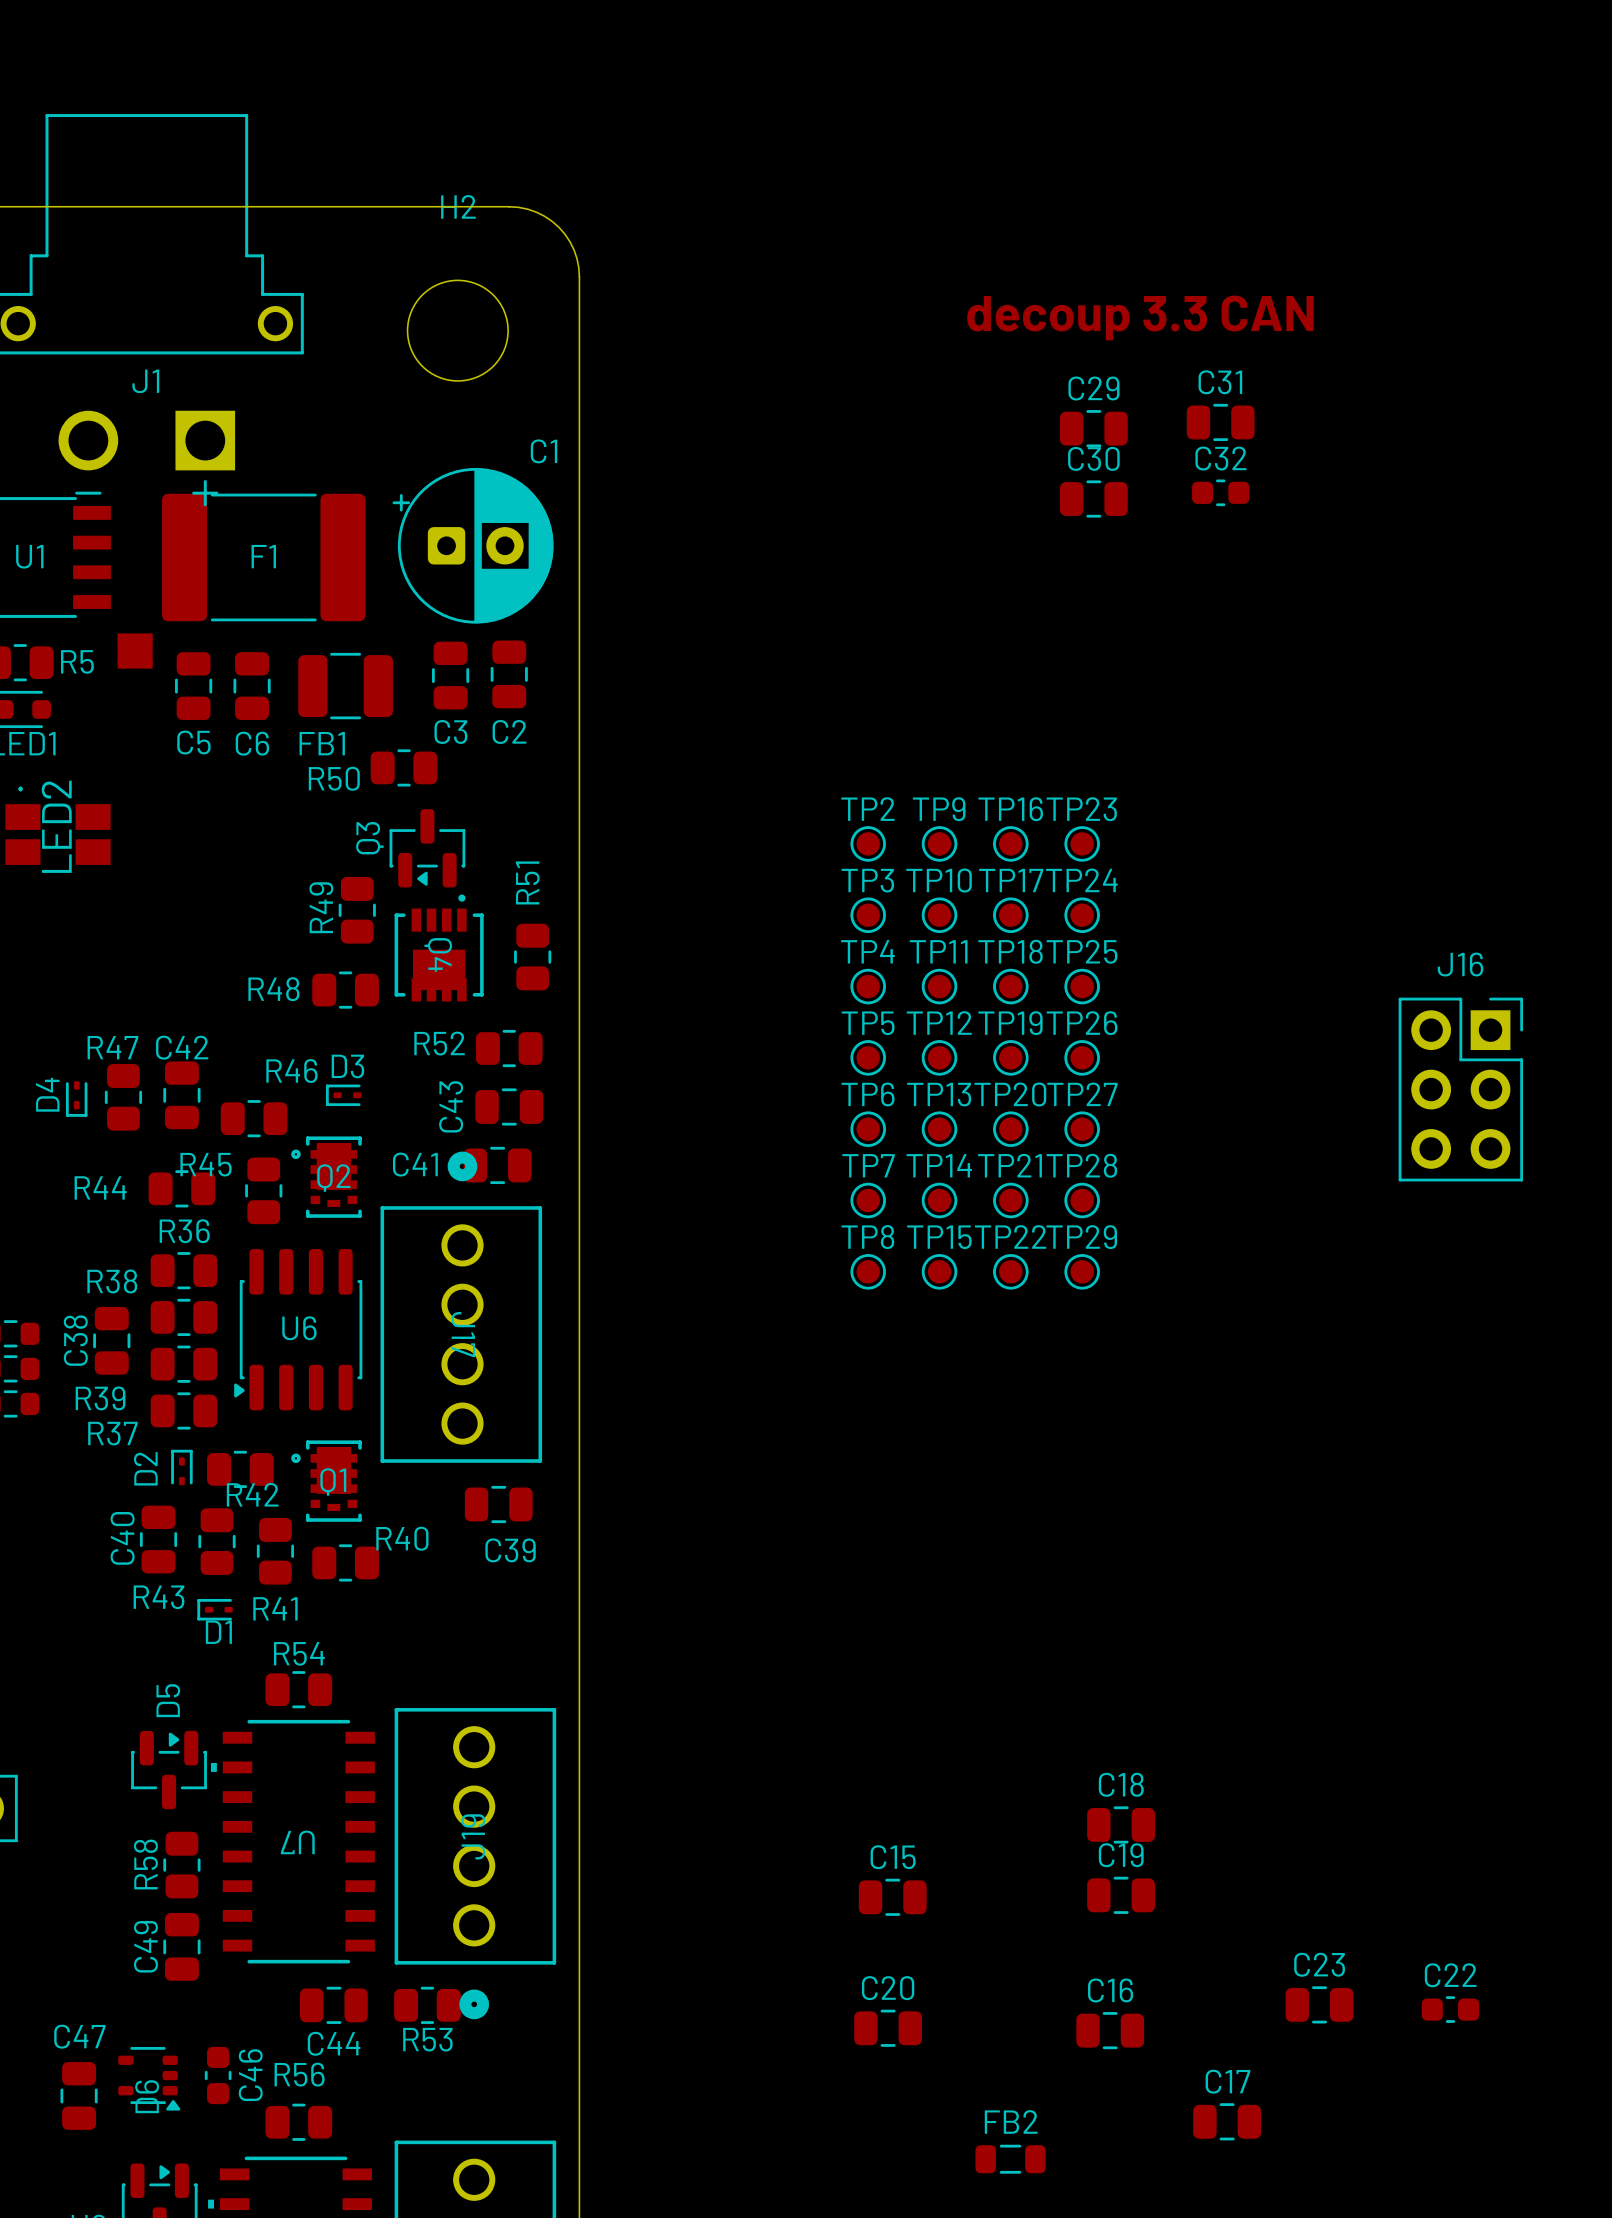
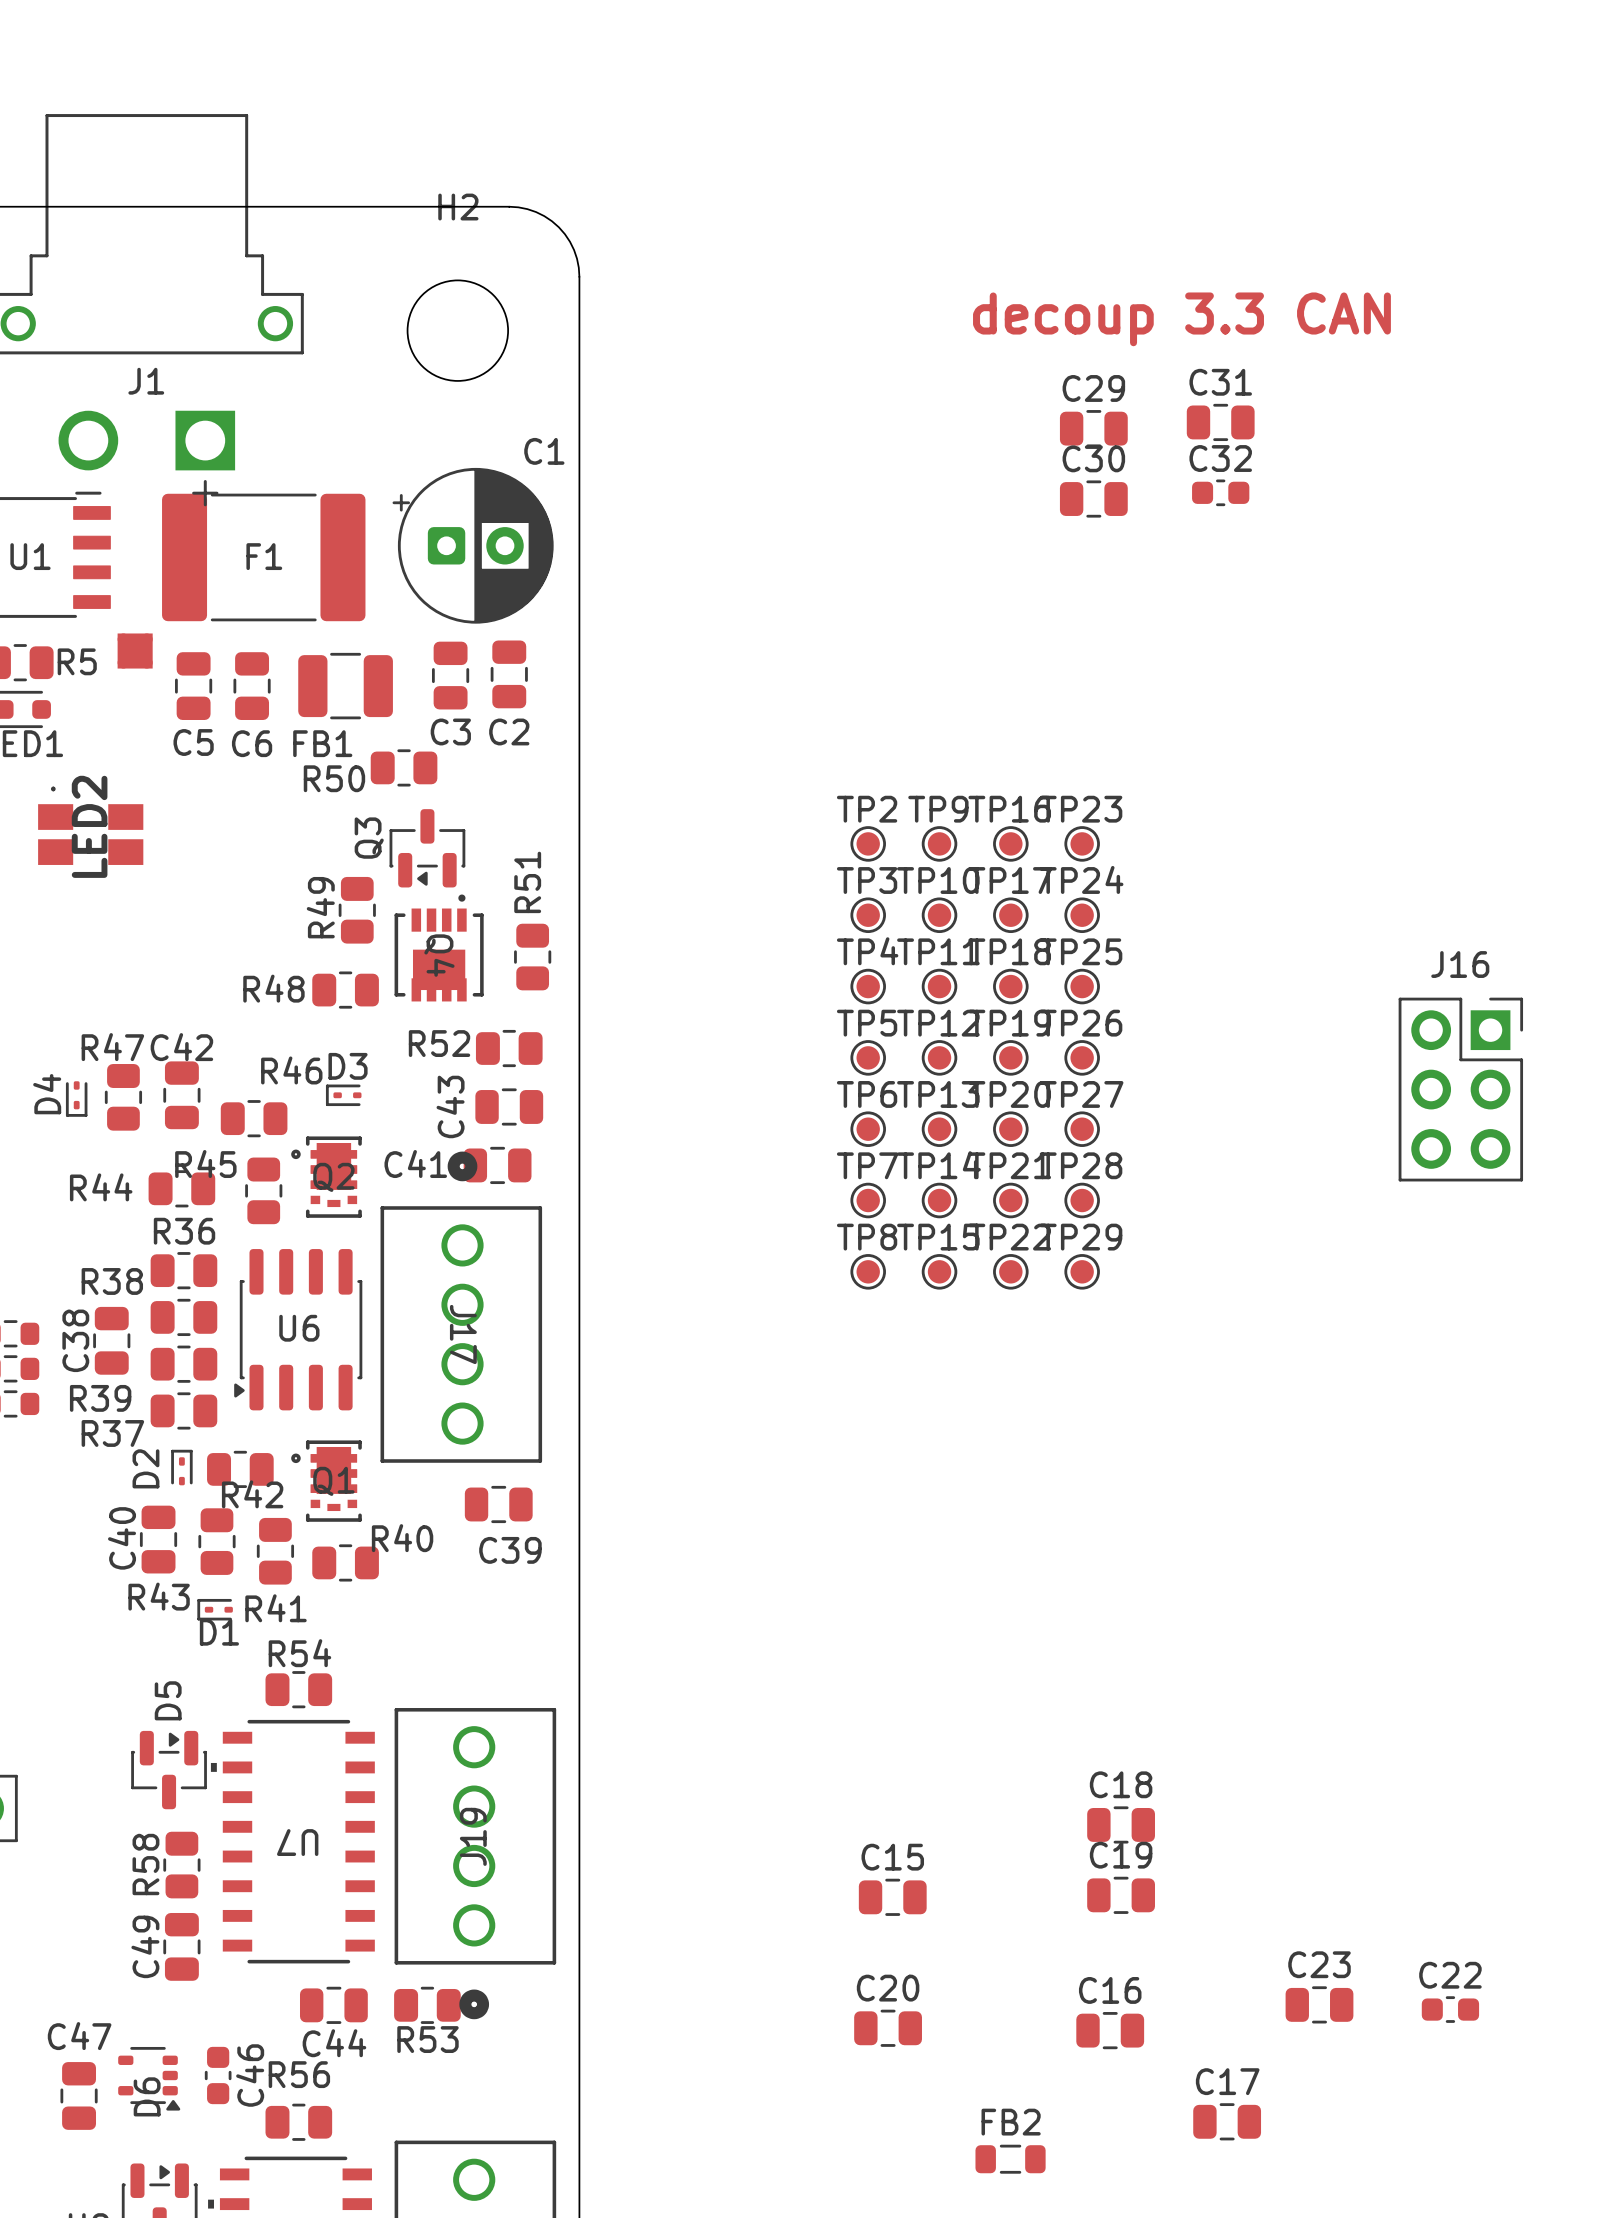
LED2 position: (57, 825) -> (90, 825)

